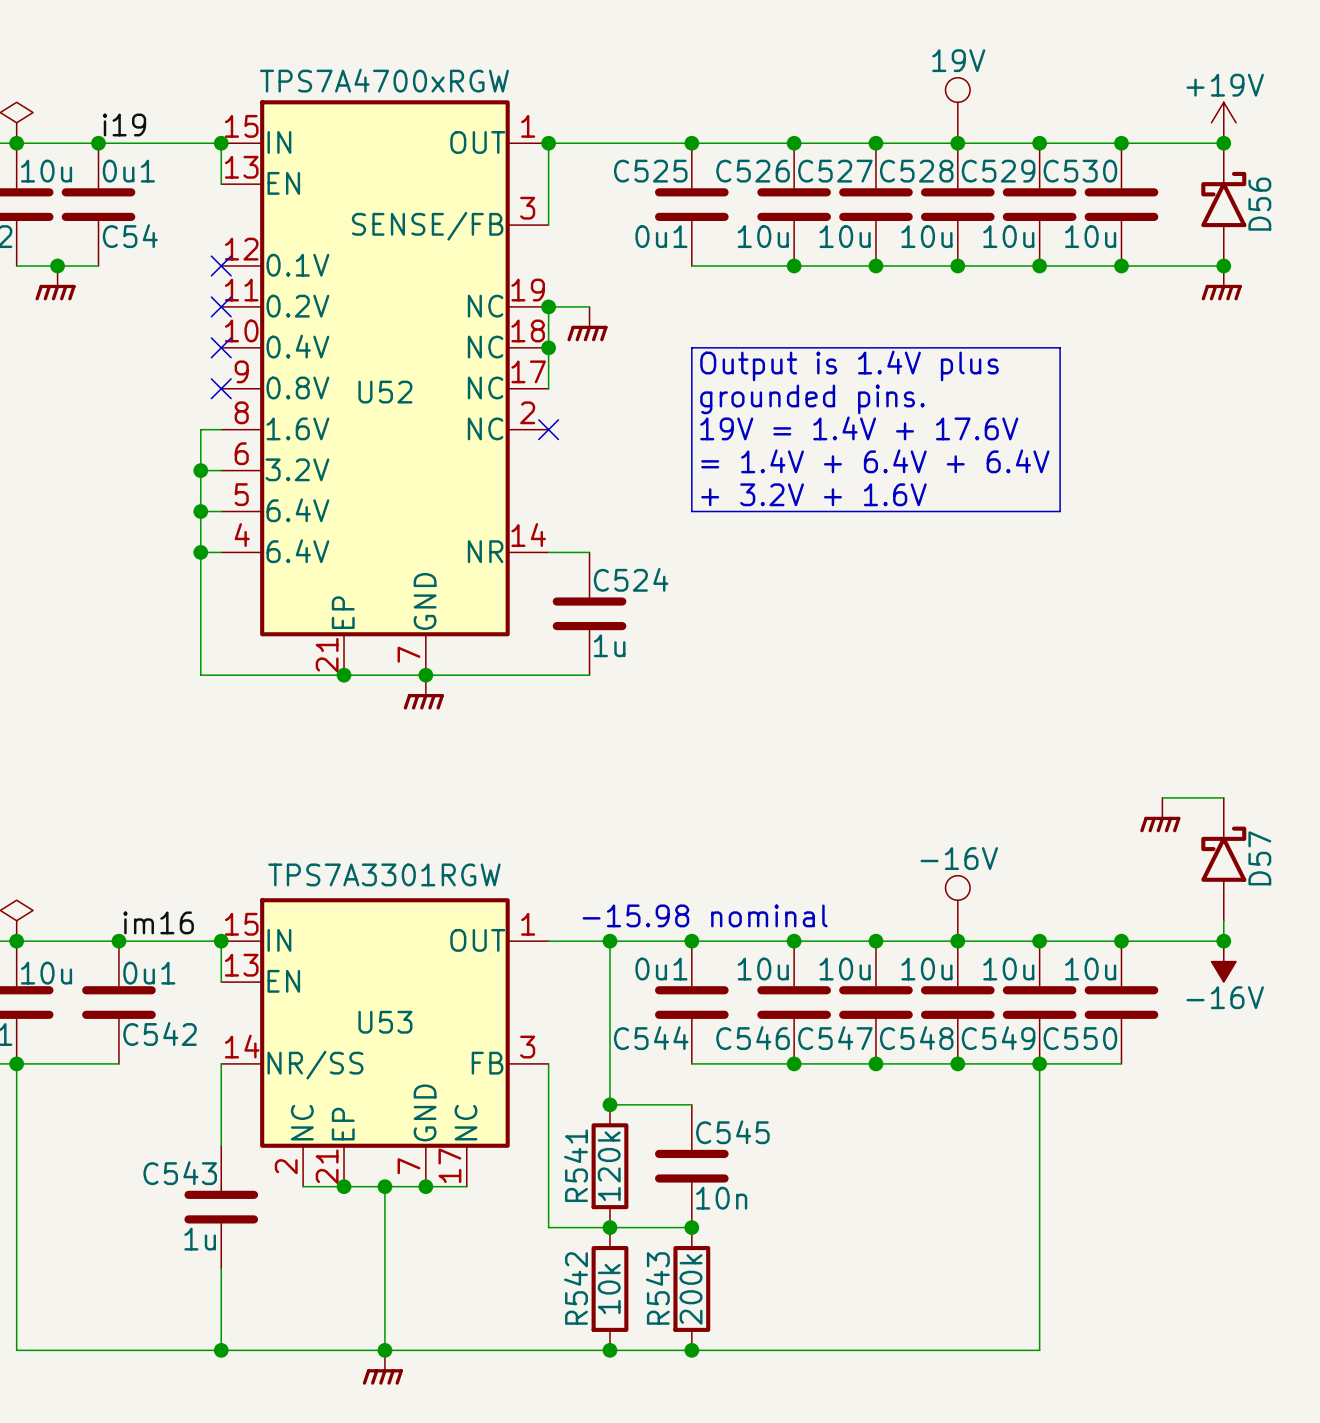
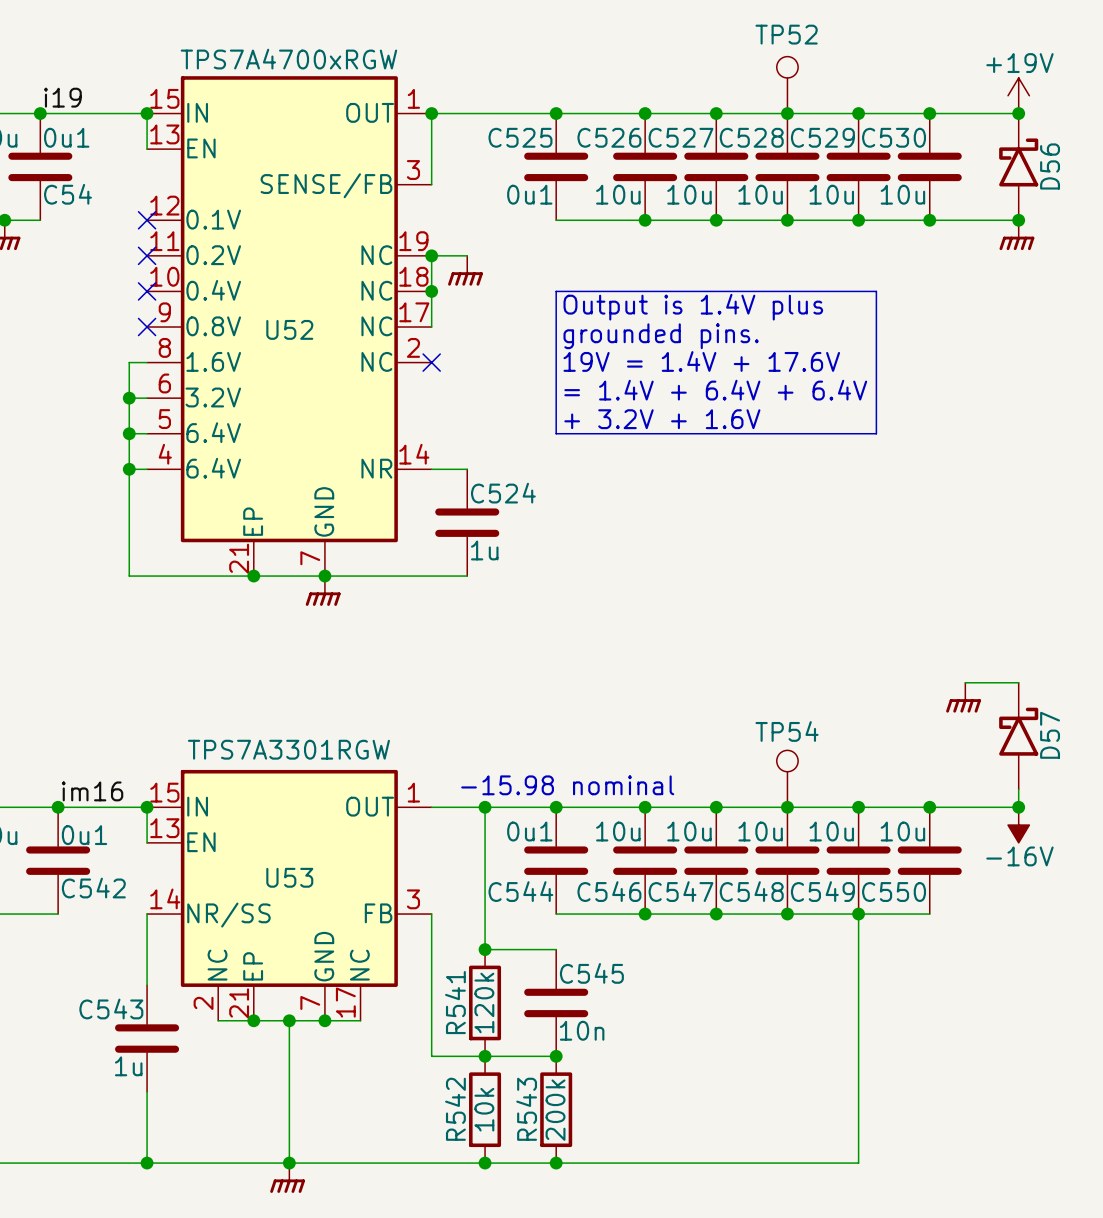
TP52 name: none -> TP52 (786, 34)
TP52 value: 19V (958, 60) -> none
TP54 name: none -> TP54 (787, 731)
TP54 value: -16V (959, 858) -> none

